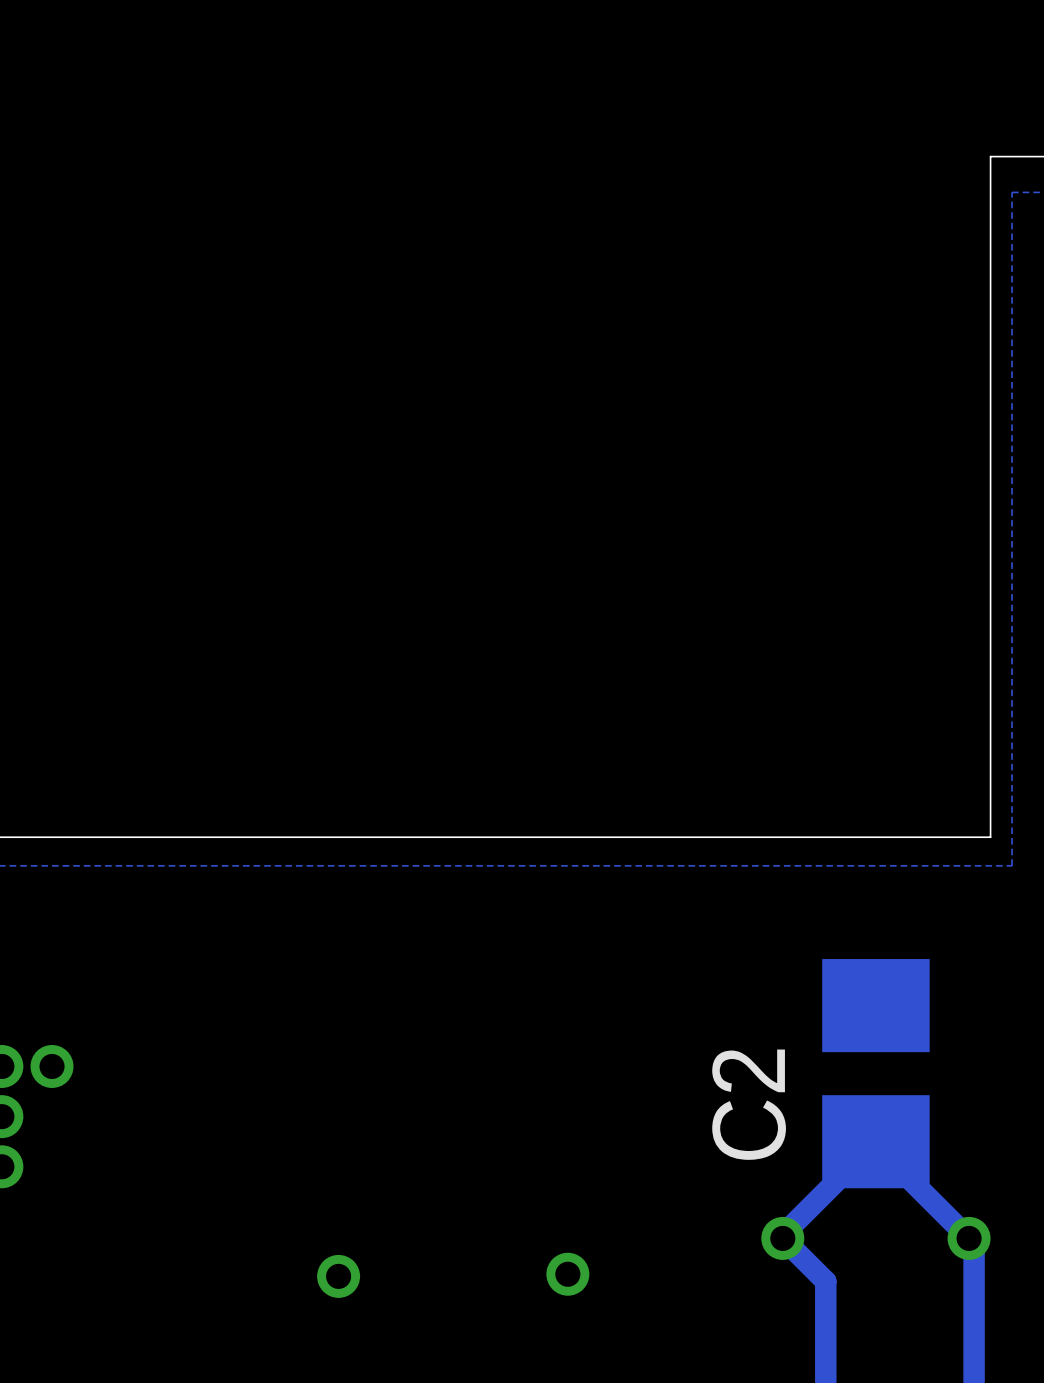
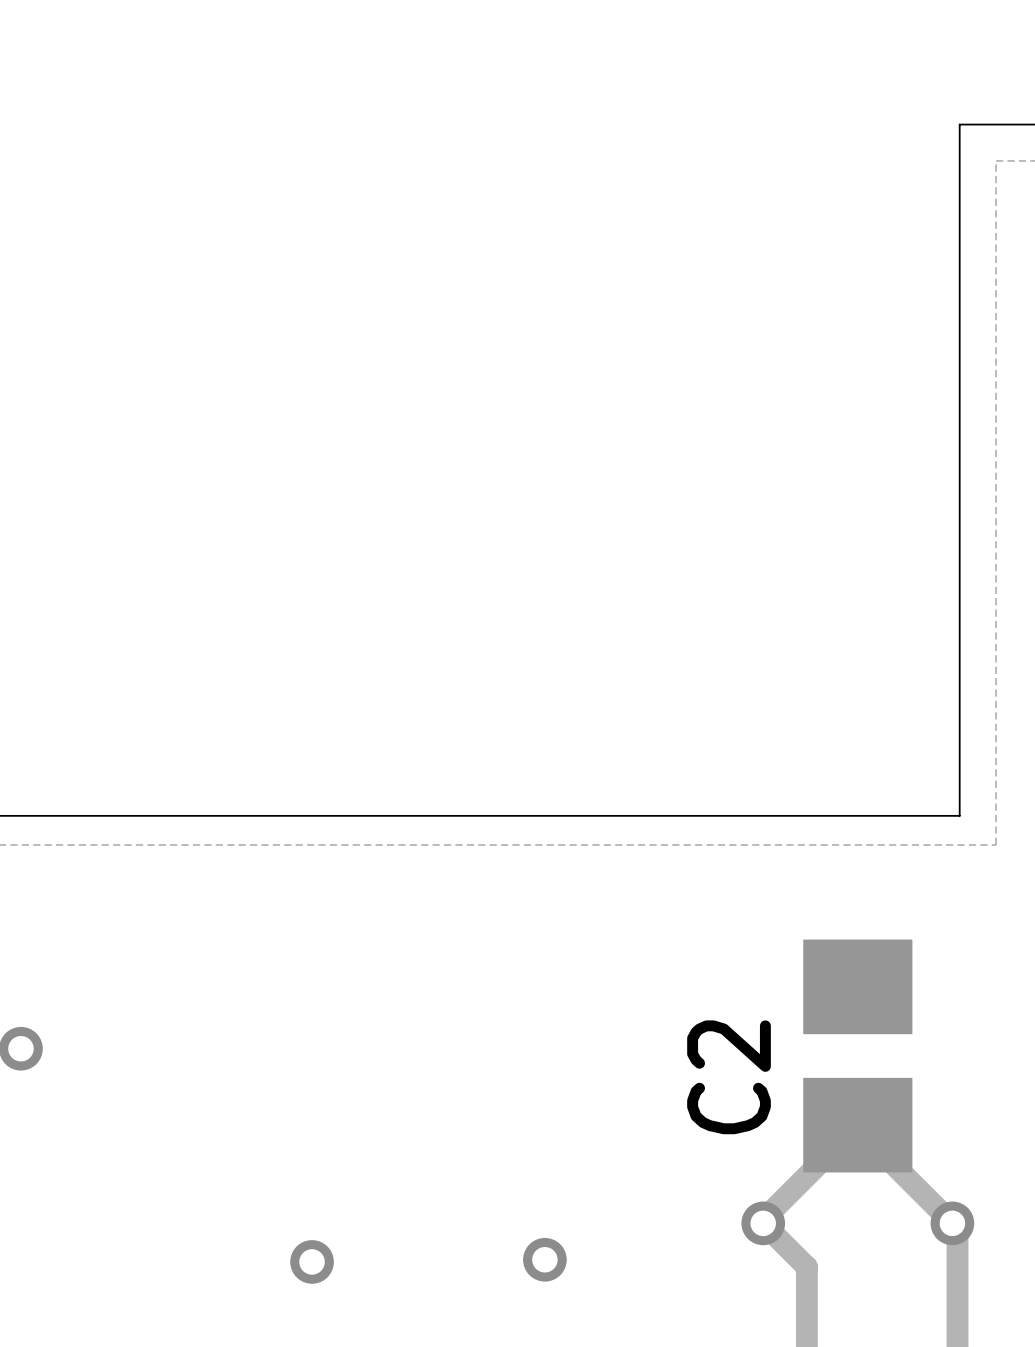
board edge: (990, 156) (990, 837) (976, 837) -> (974, 124) (959, 124) (959, 815)

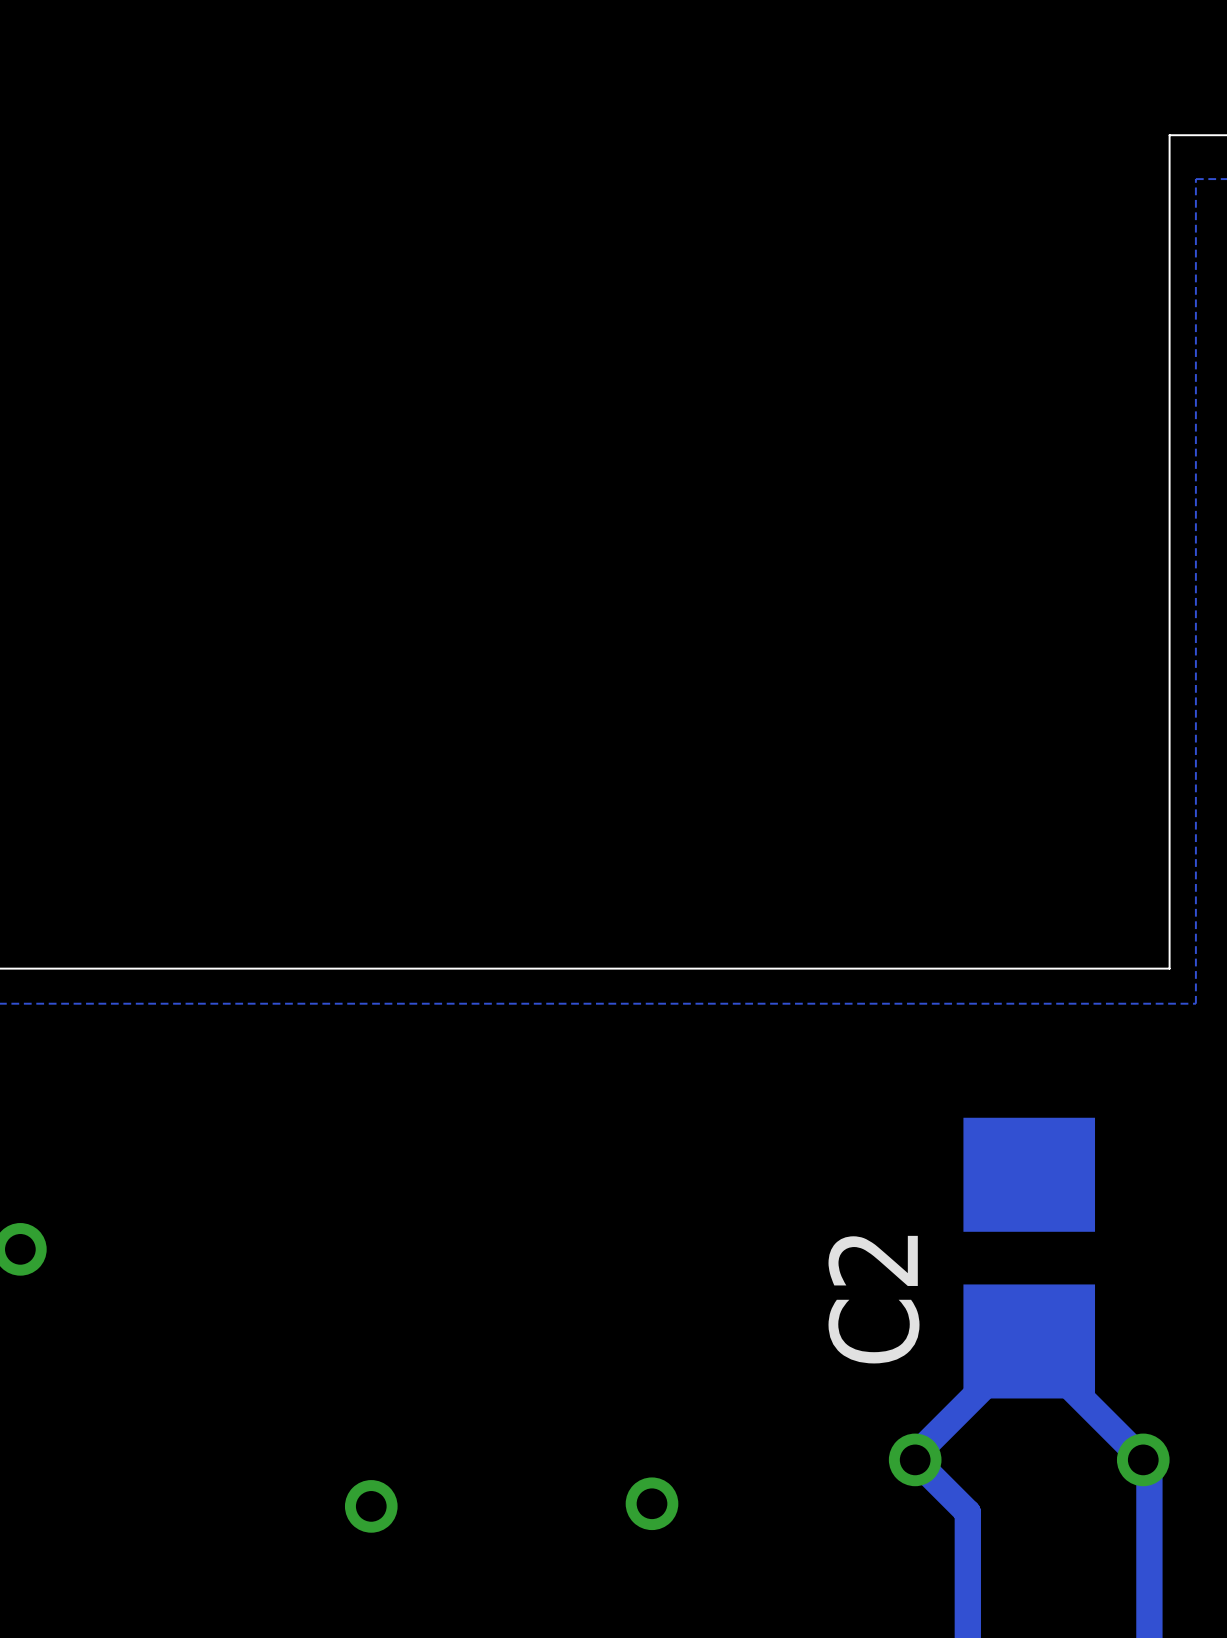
board edge: (974, 124) (959, 124) (959, 815) -> (1169, 135) (1169, 968) (1152, 968)

